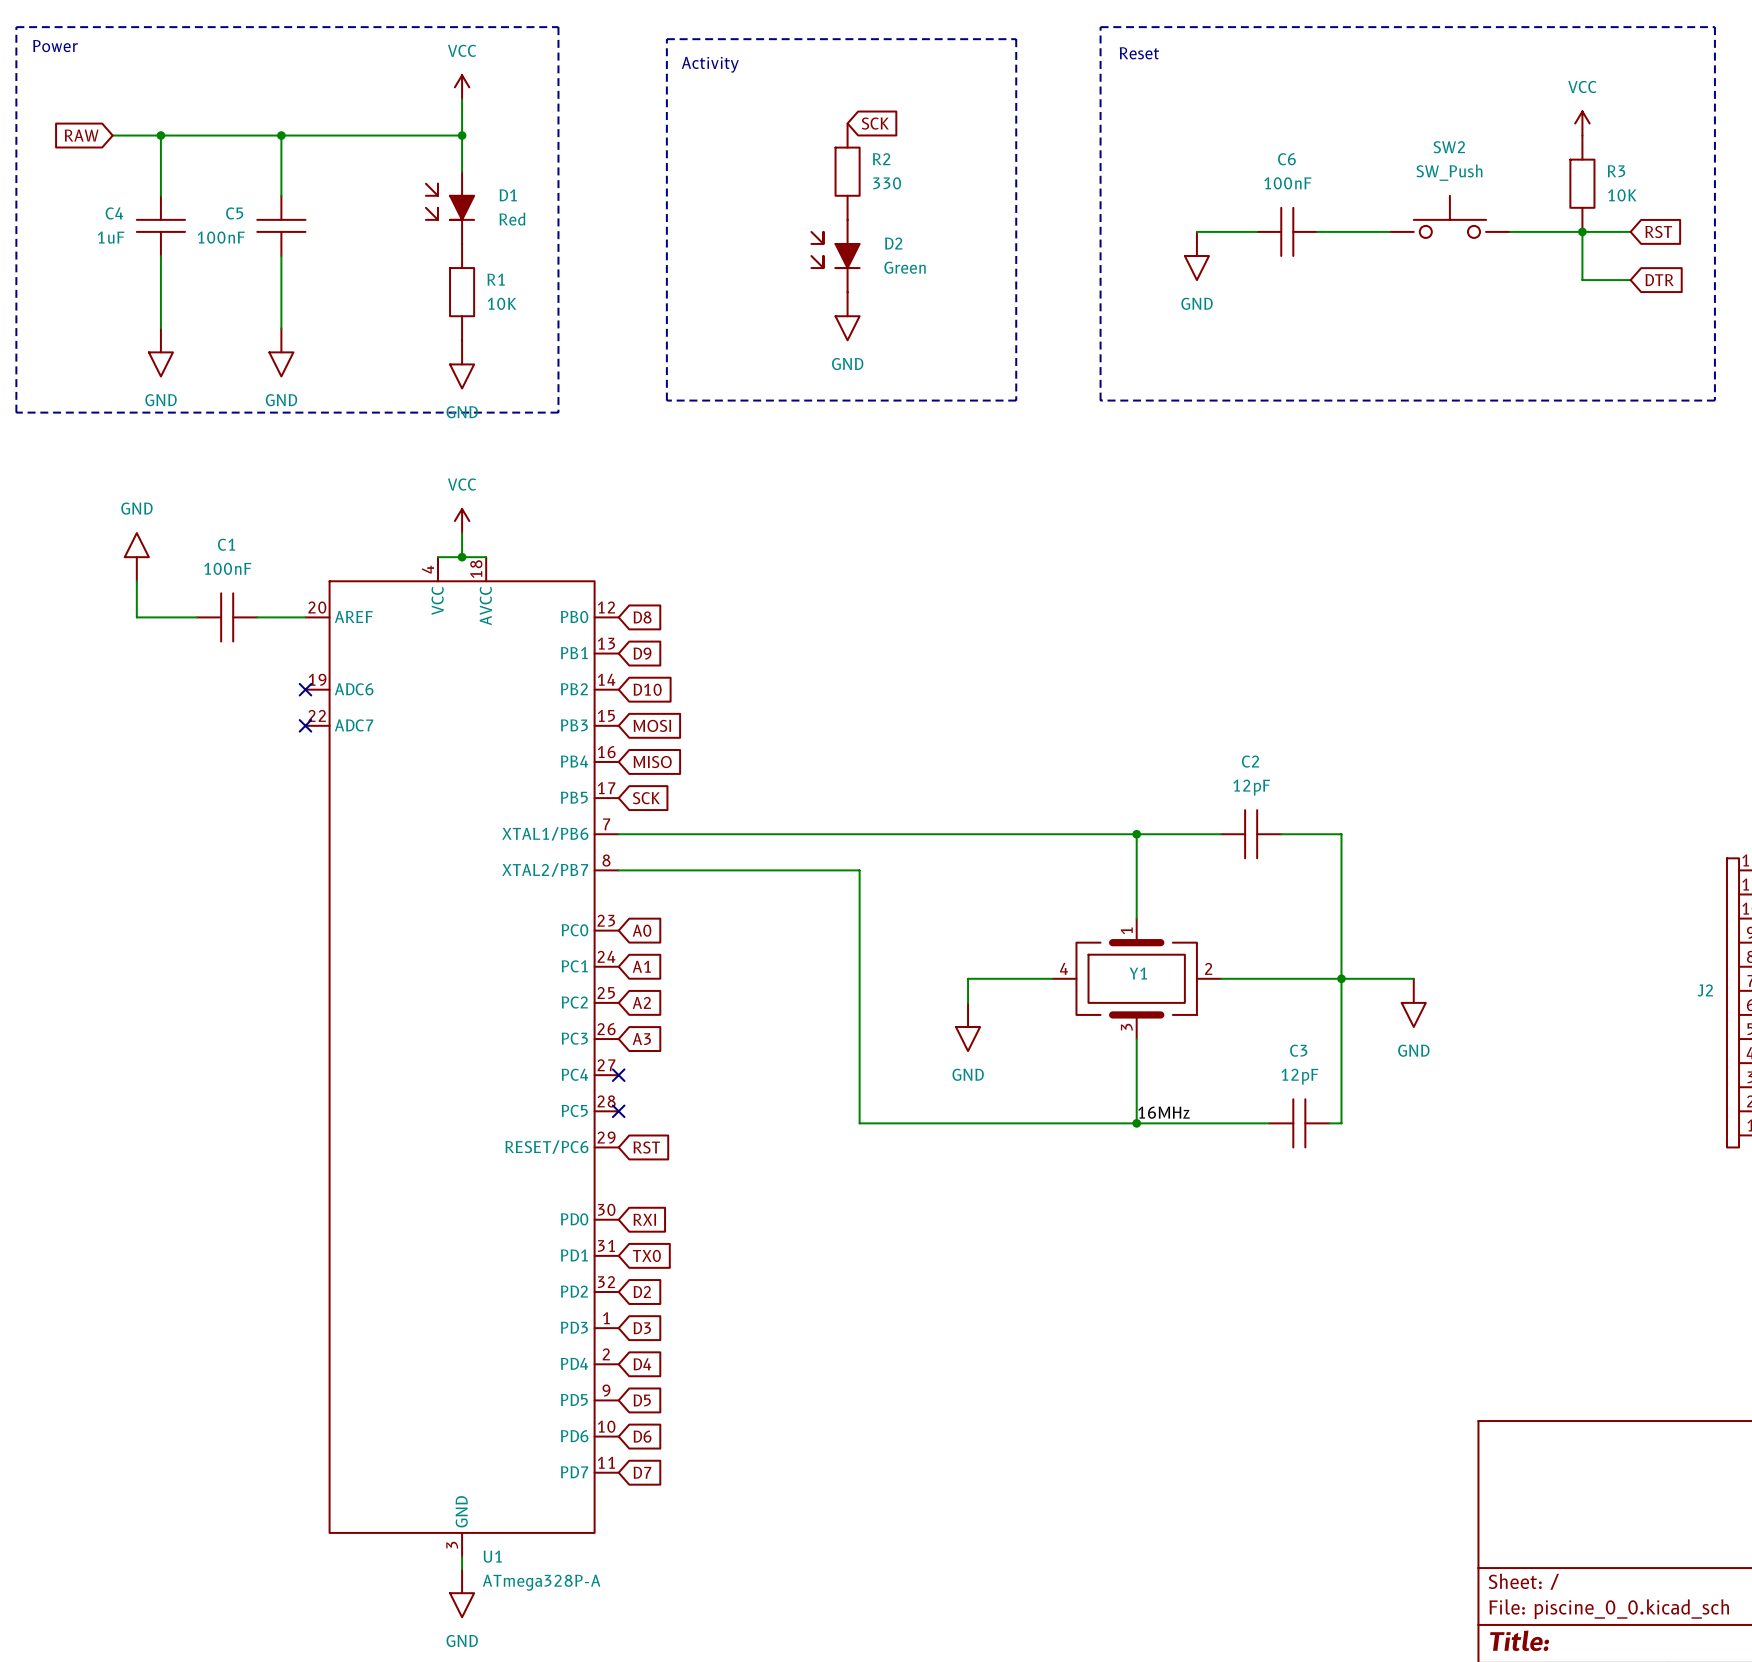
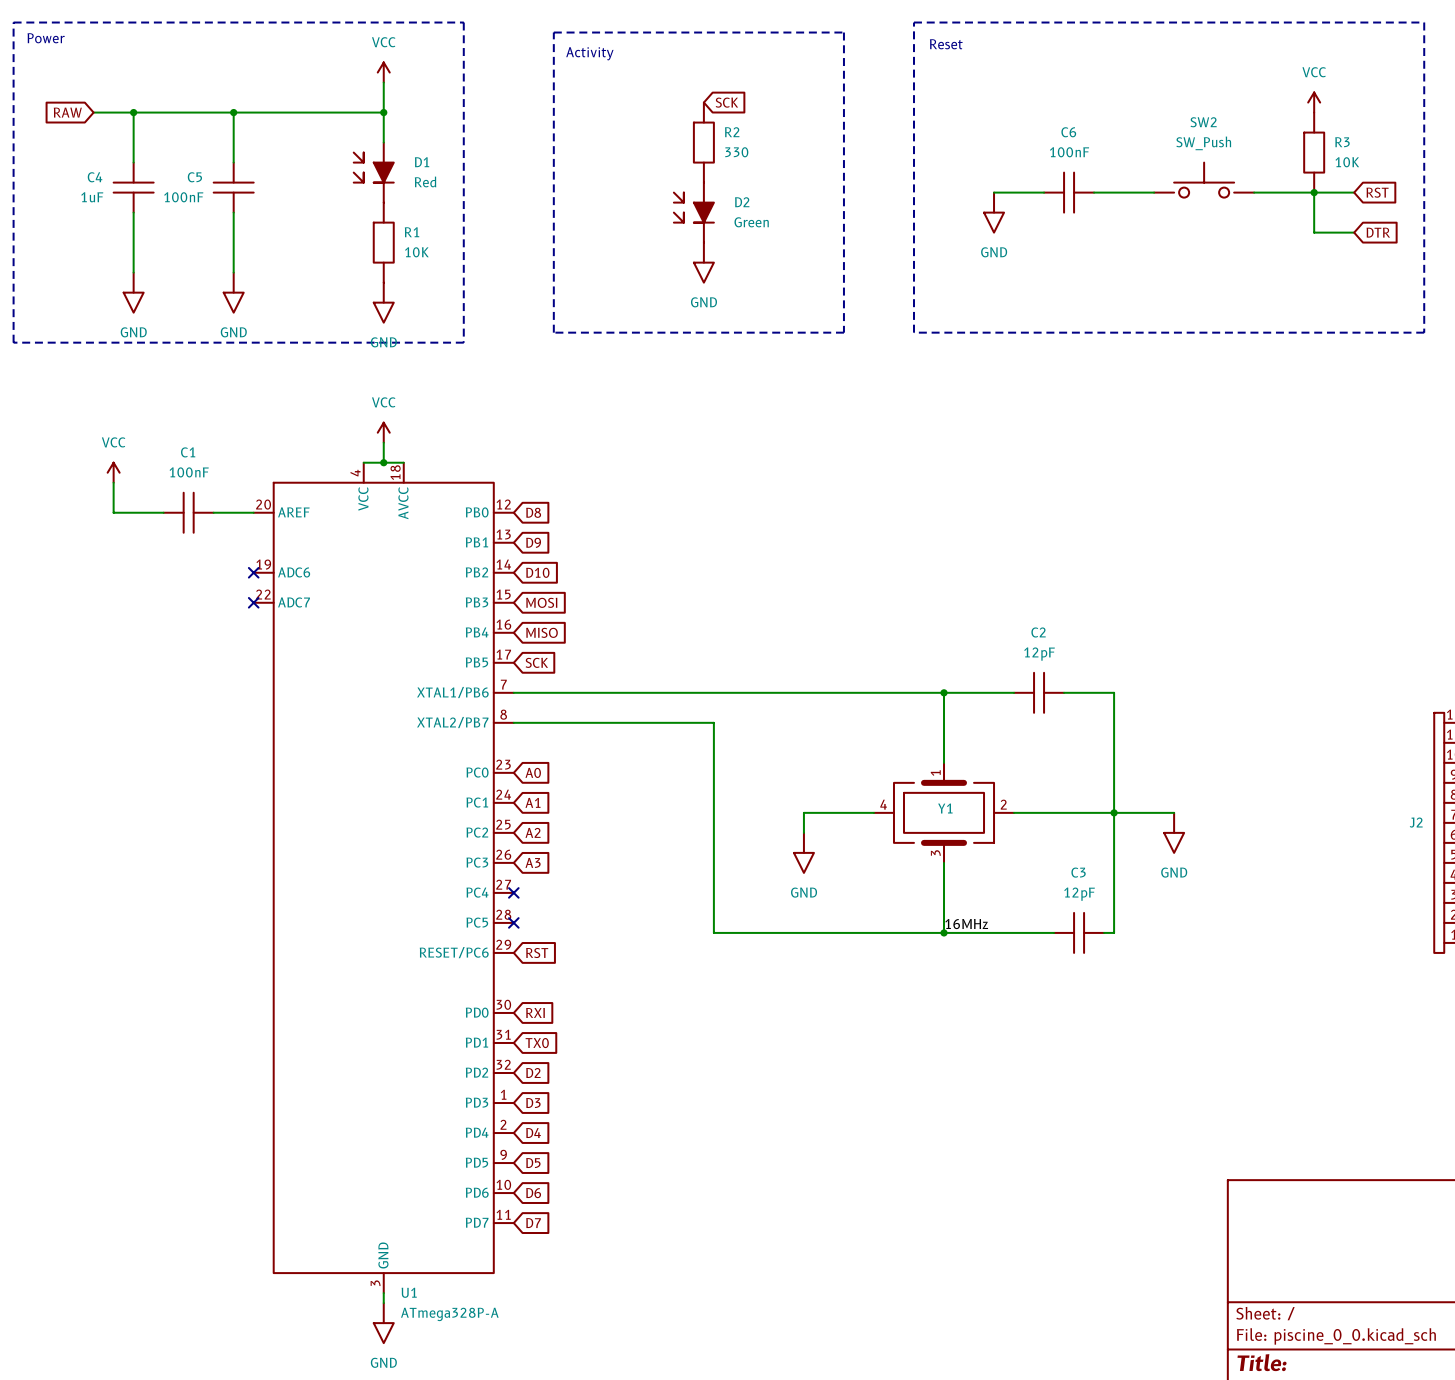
power symbol: GND (136, 557) -> none
power symbol: none -> VCC (113, 472)

